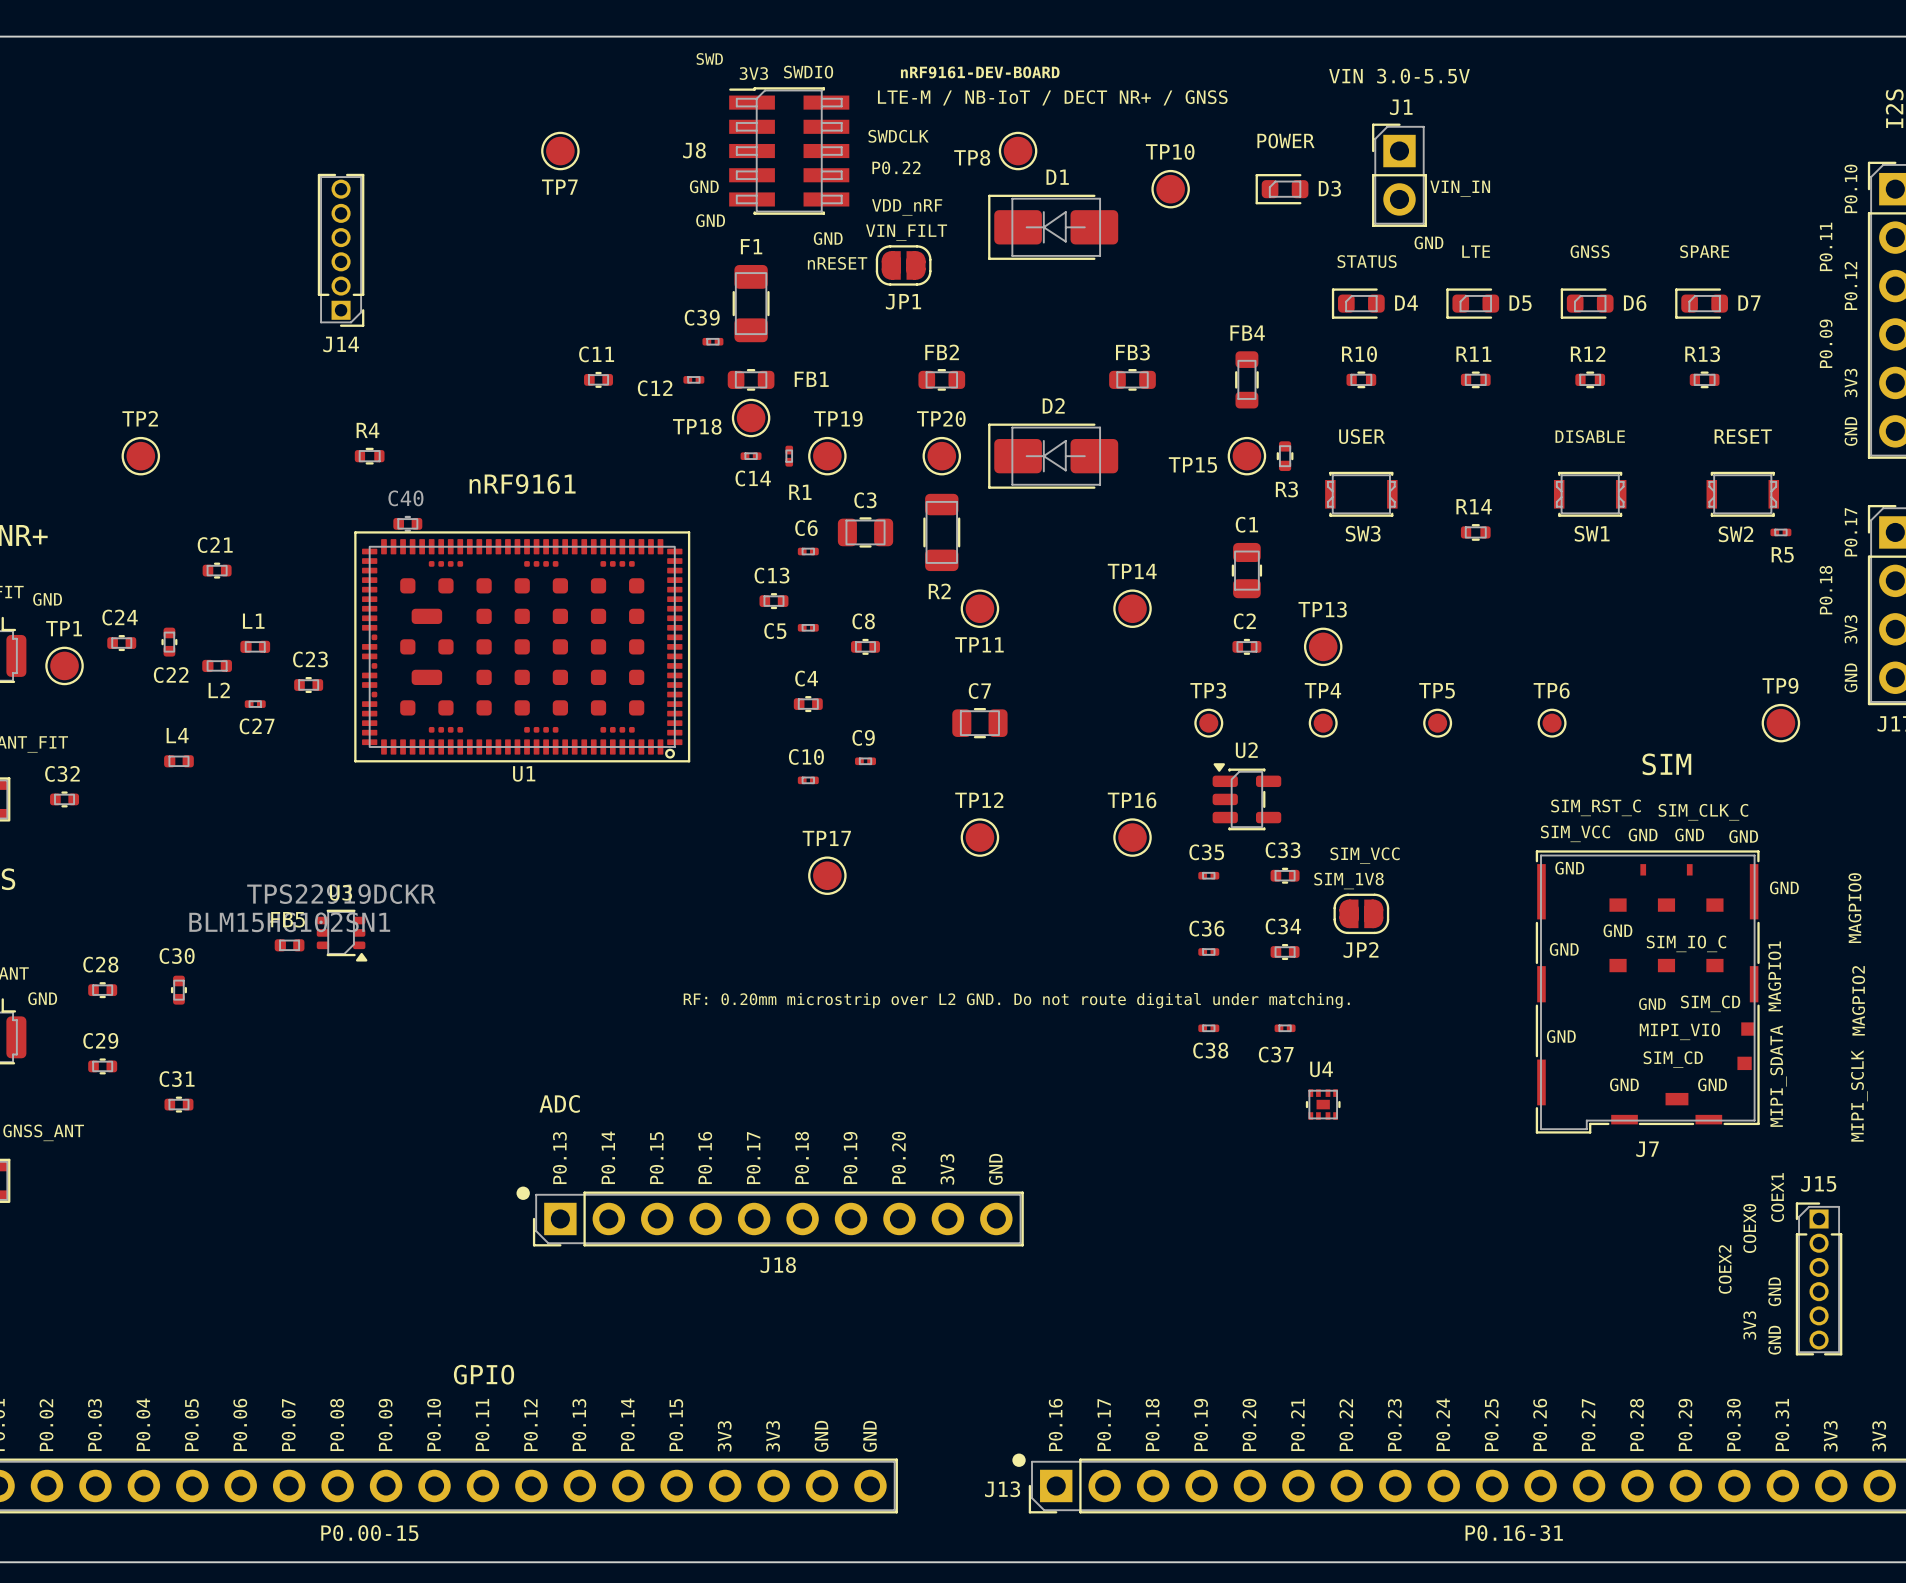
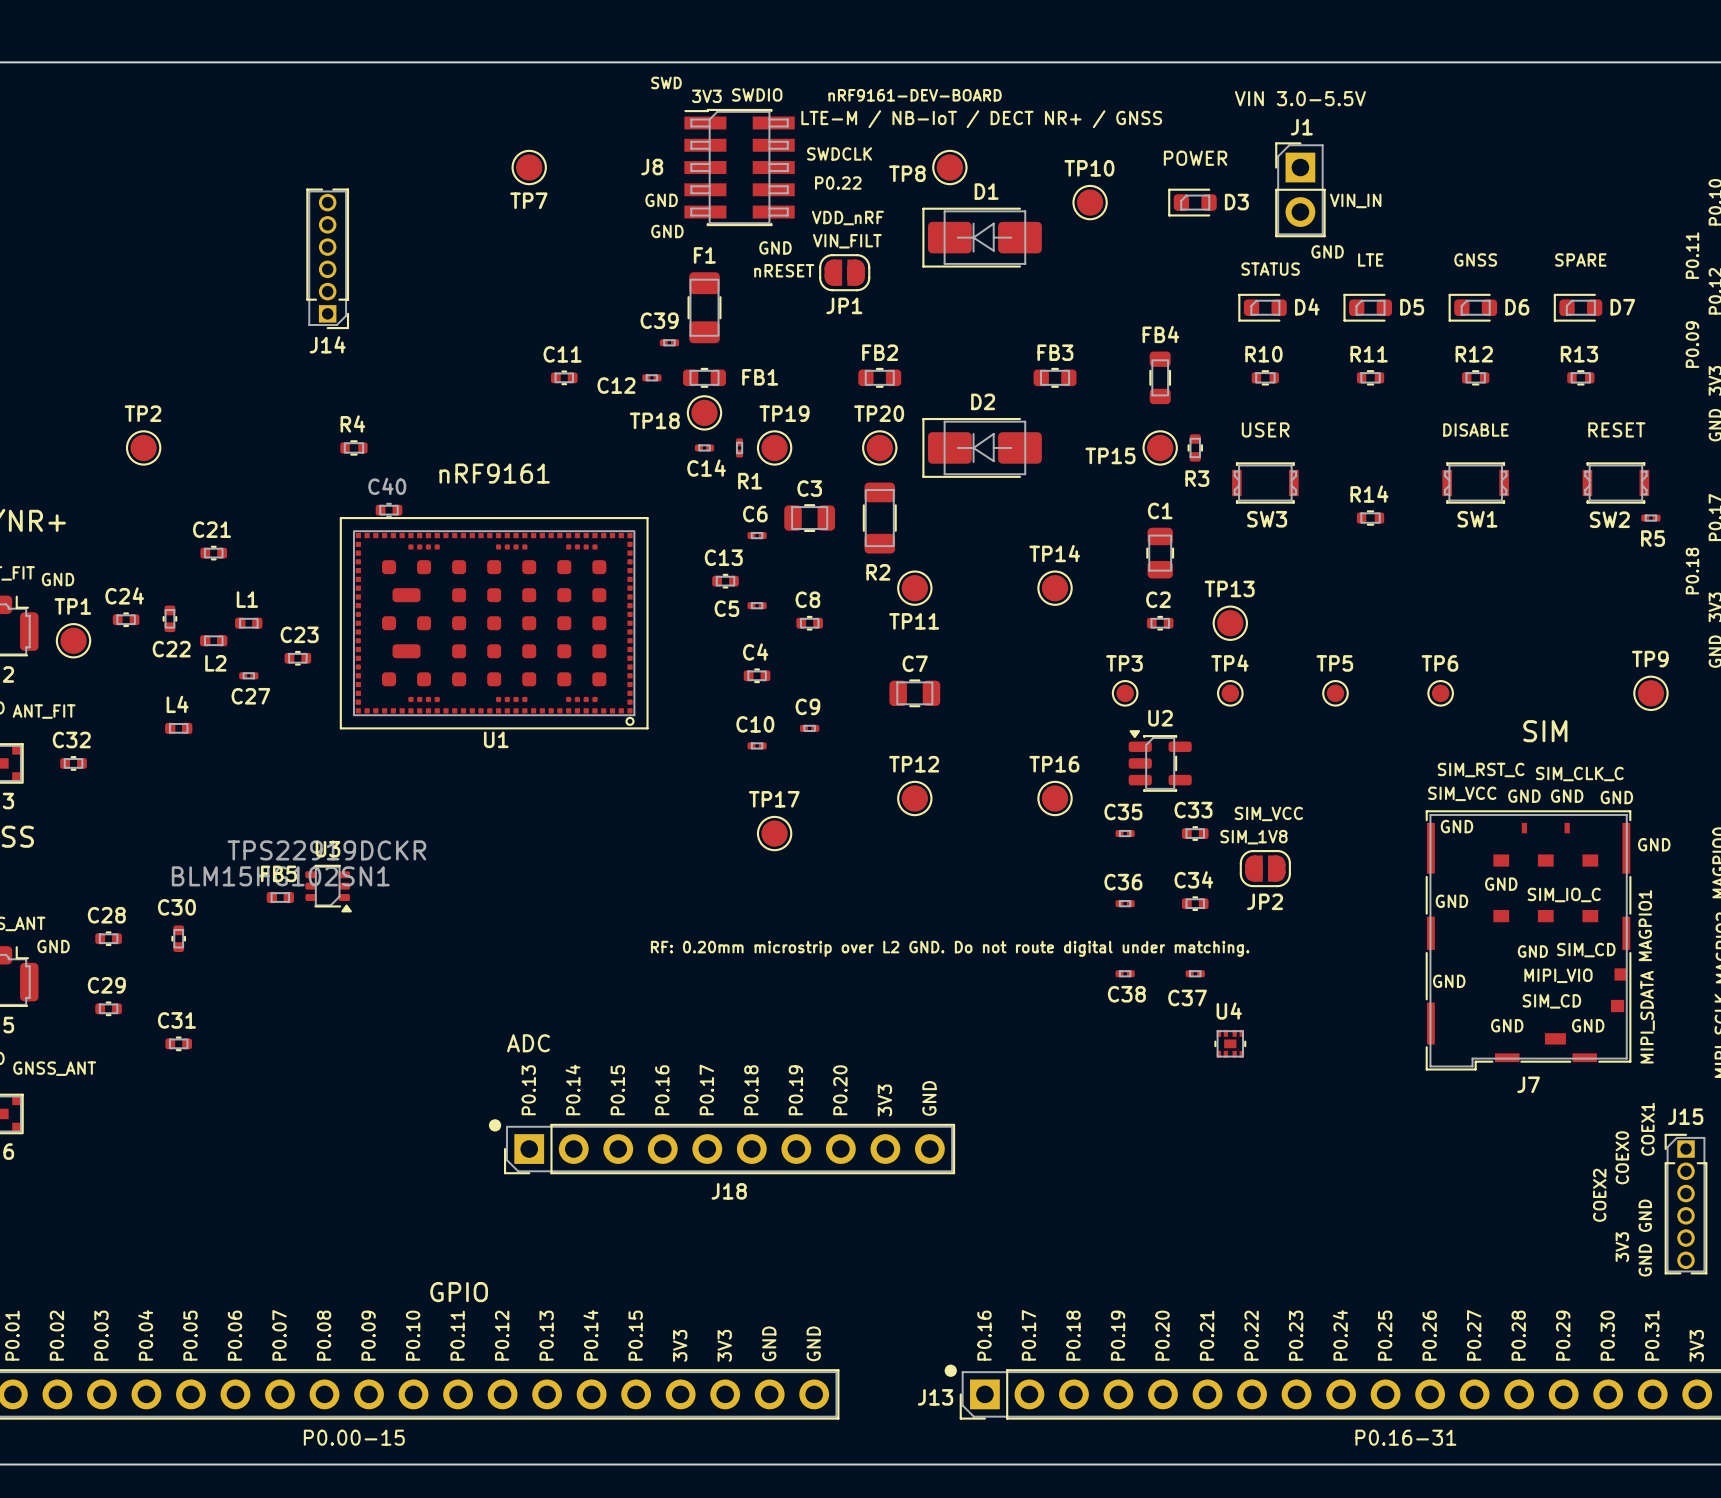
U1 footprint: [354, 531, 691, 763] -> [339, 517, 649, 730]

